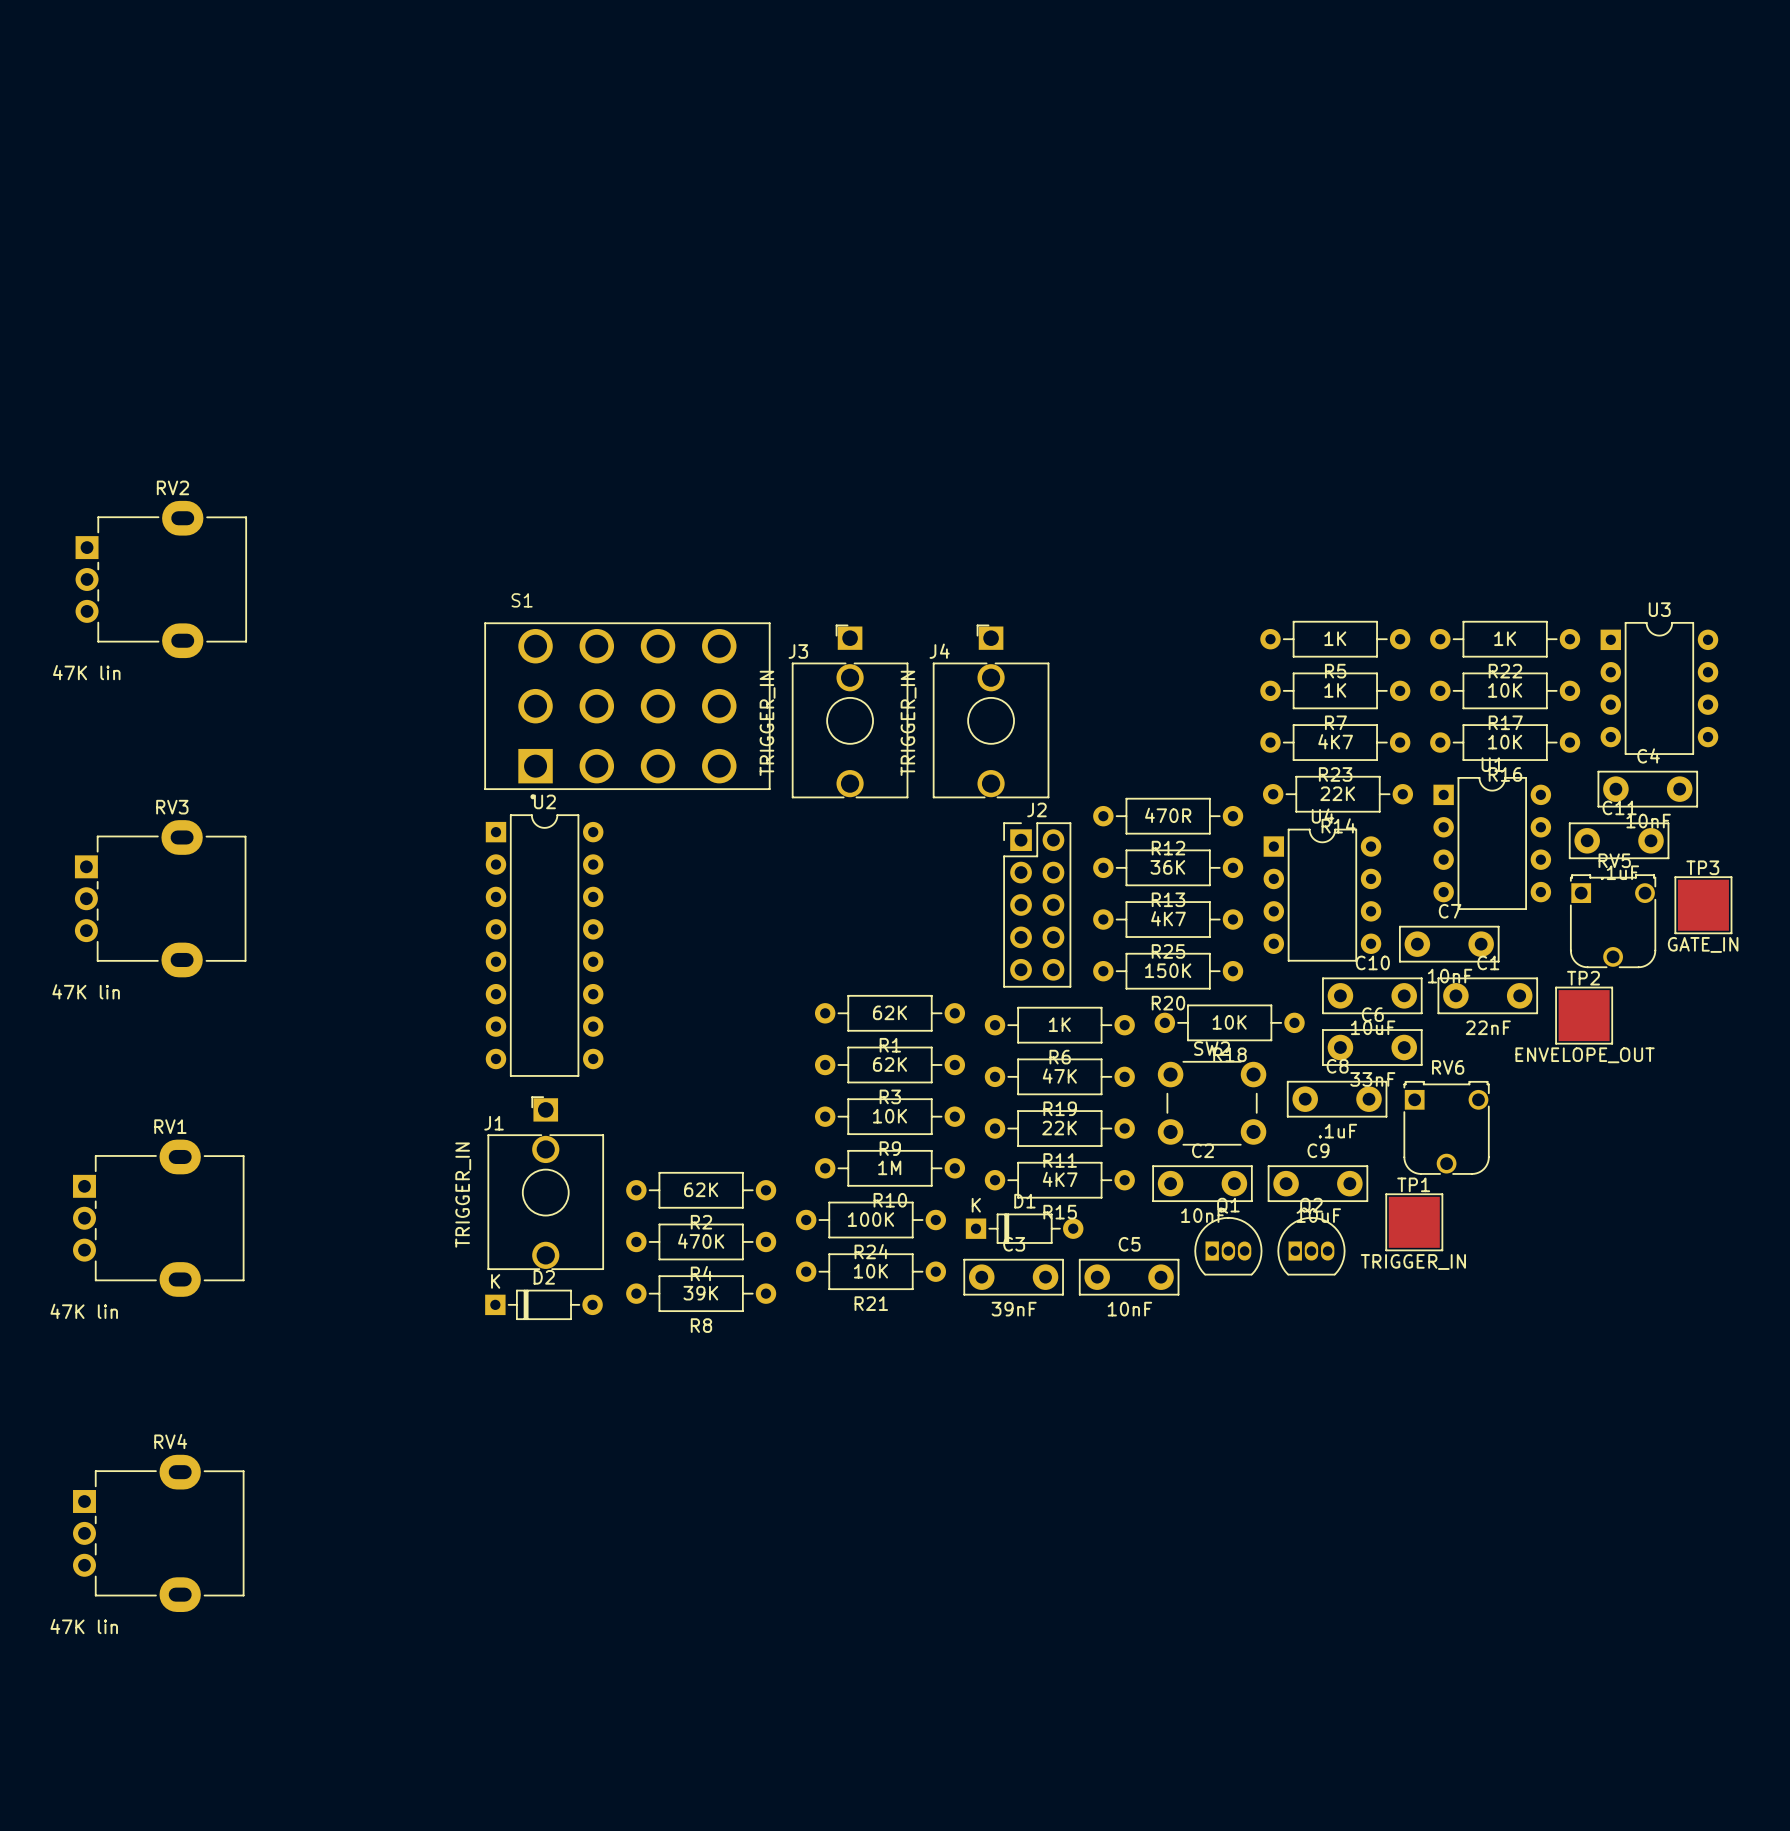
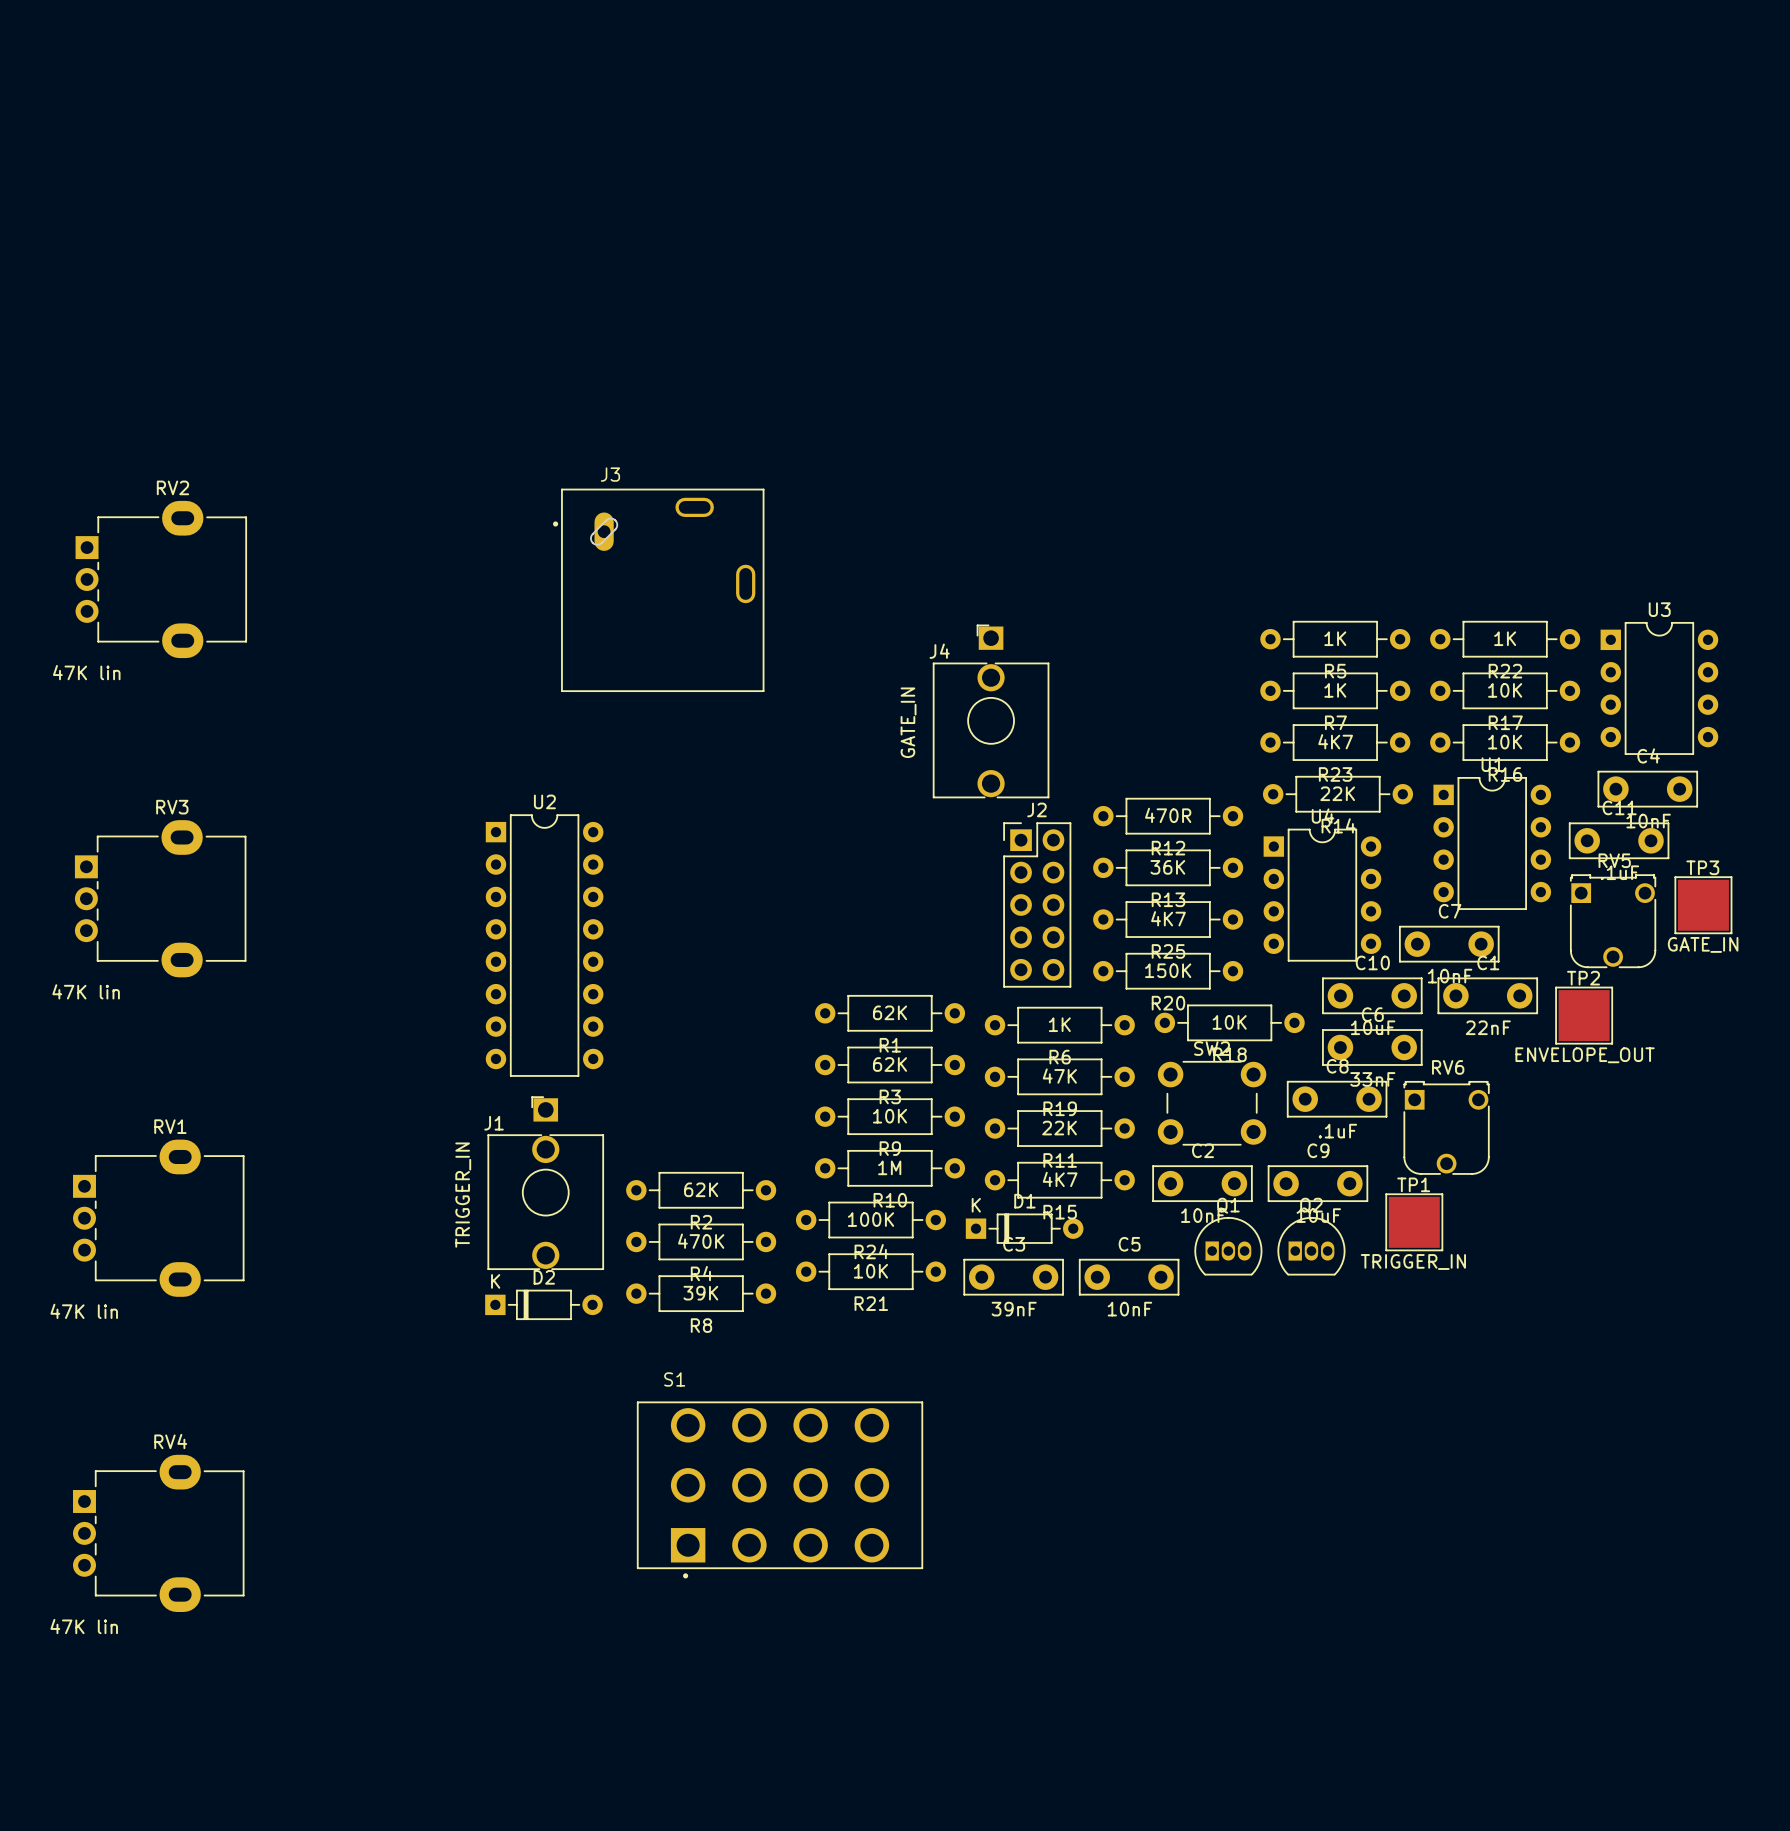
J3 footprint: [791, 624, 909, 799] -> [553, 488, 765, 692]
J3 name position: J3 (798, 651) -> J3 (610, 474)
S1 position: (627, 710) -> (780, 1489)
J3 value: TRIGGER_IN (767, 723) -> none
J4 value: TRIGGER_IN (908, 723) -> GATE_IN (908, 722)

